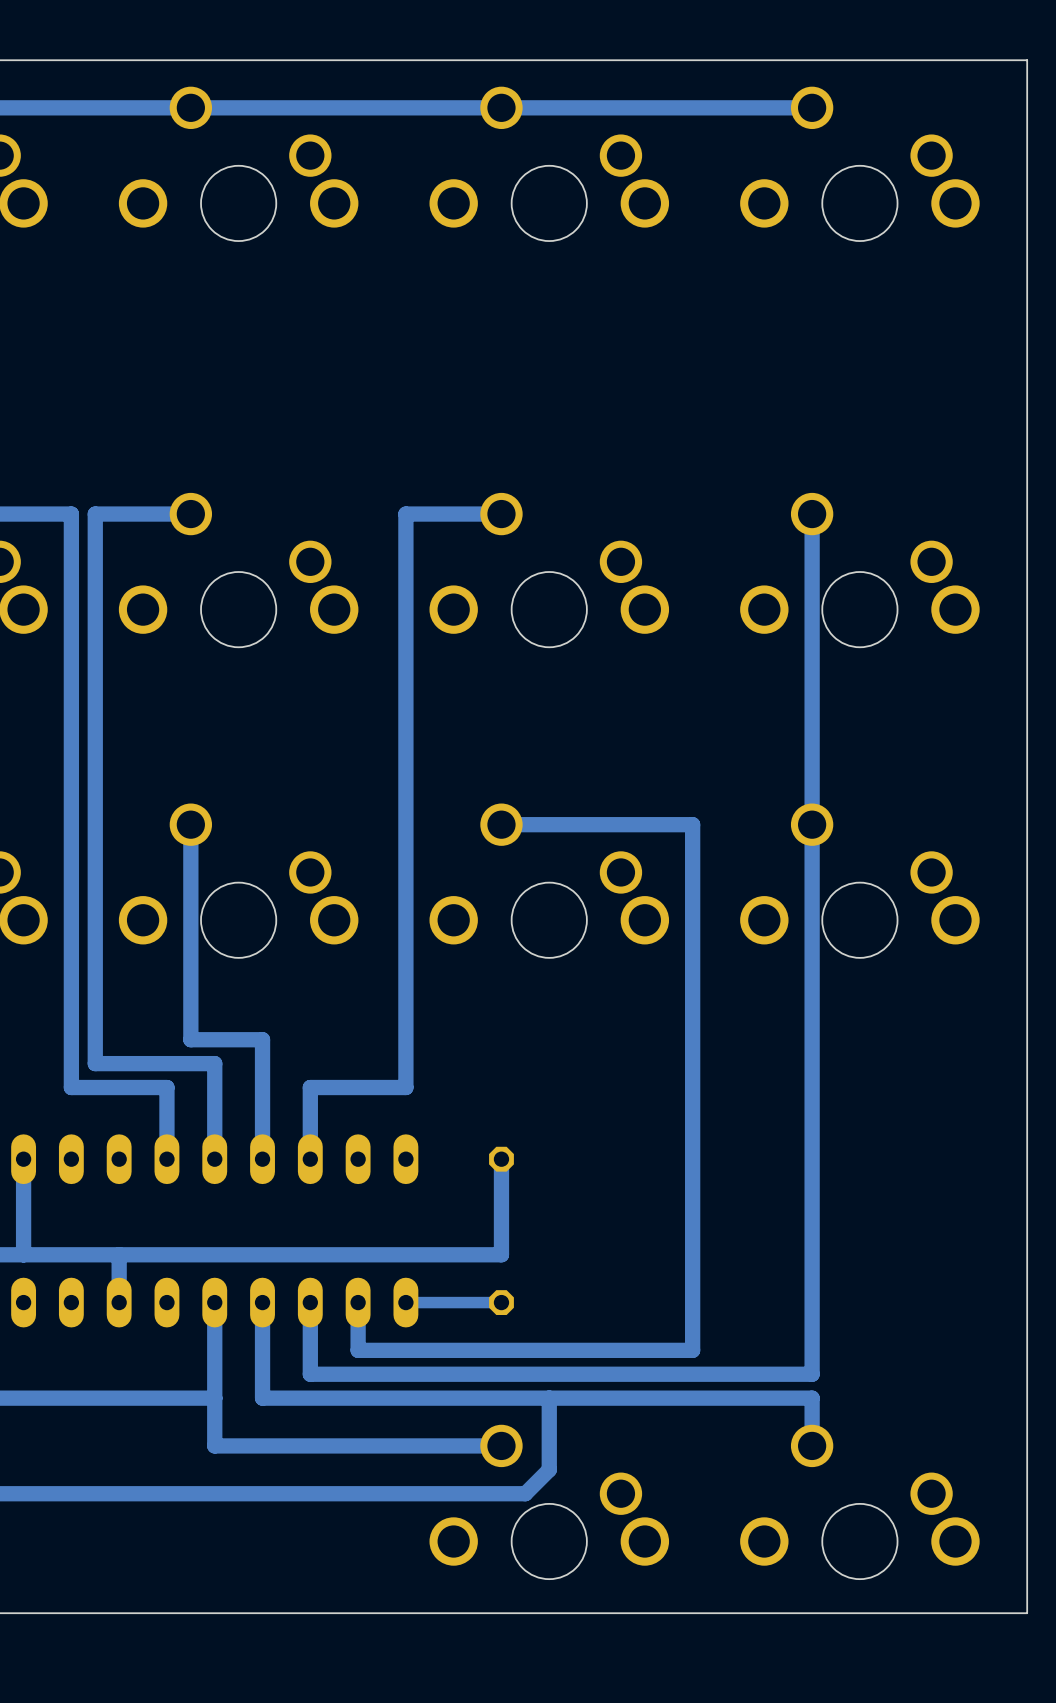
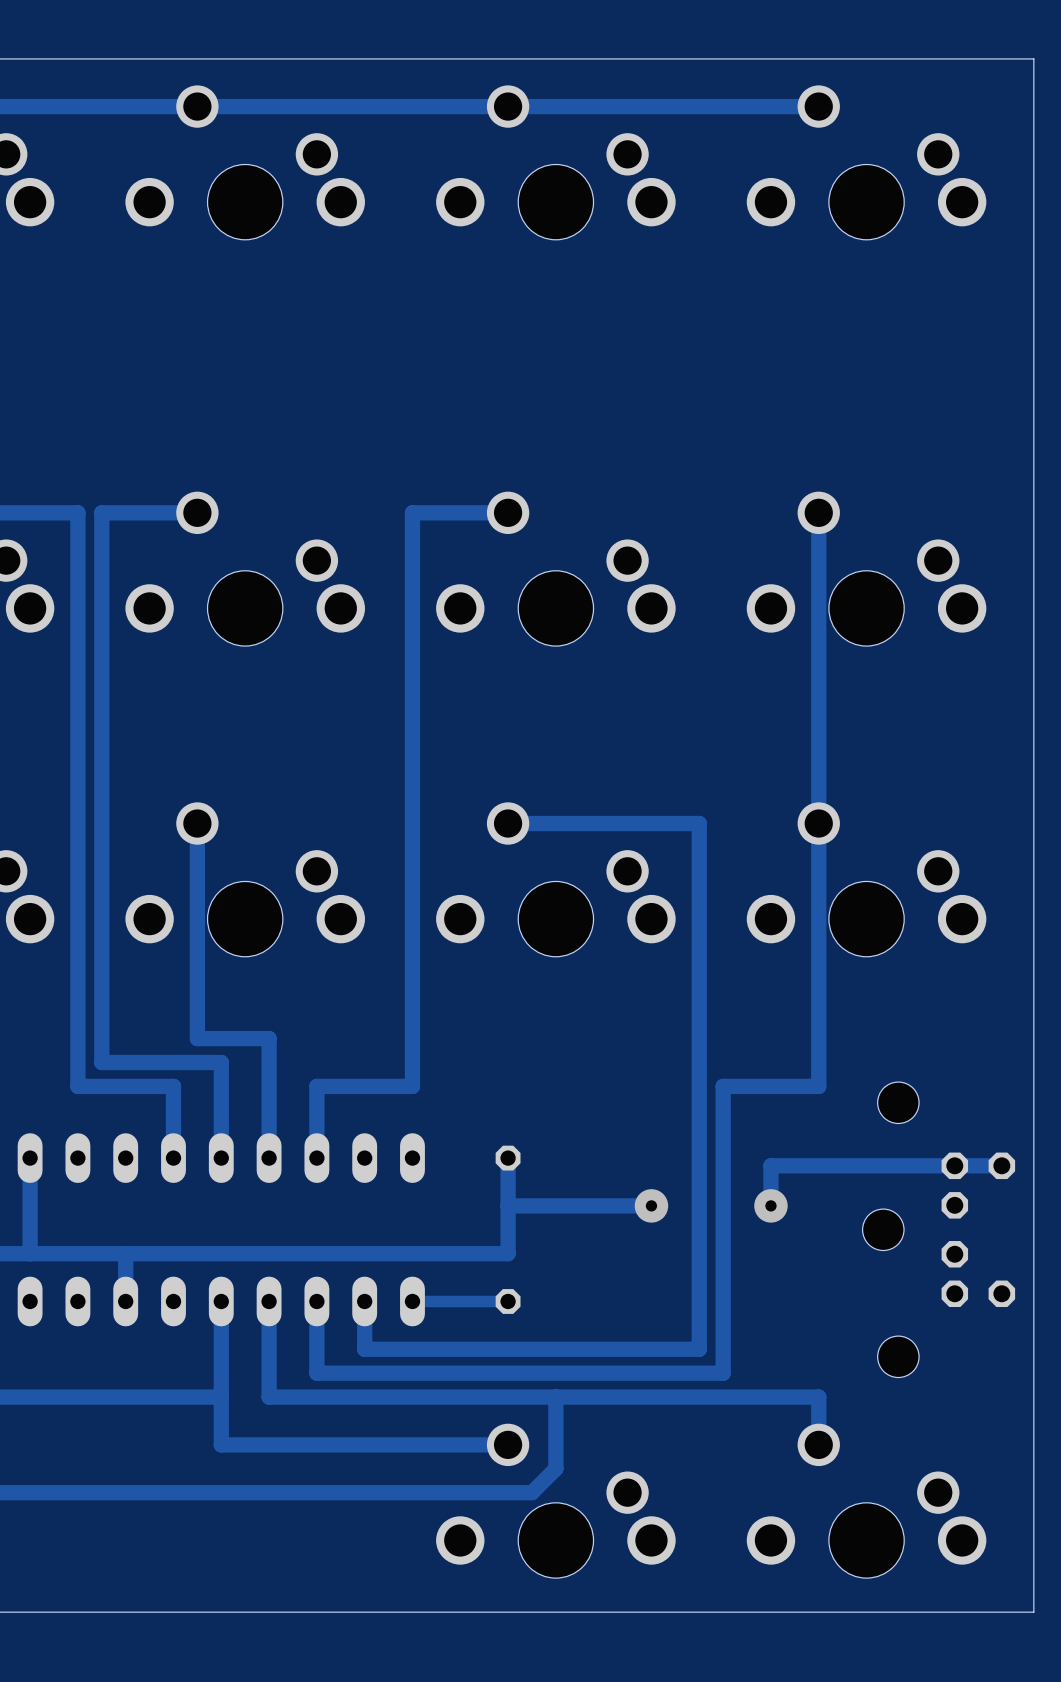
track: (812, 1087) (812, 1374) (716, 1374) -> (818, 1086) (723, 1086) (723, 1373)
track: none -> (1001, 1165) (770, 1165) (770, 1205)
track: none -> (651, 1205) (508, 1205)
via: none -> (651, 1205)
via: none -> (770, 1205)
part: none -> (938, 1229)

